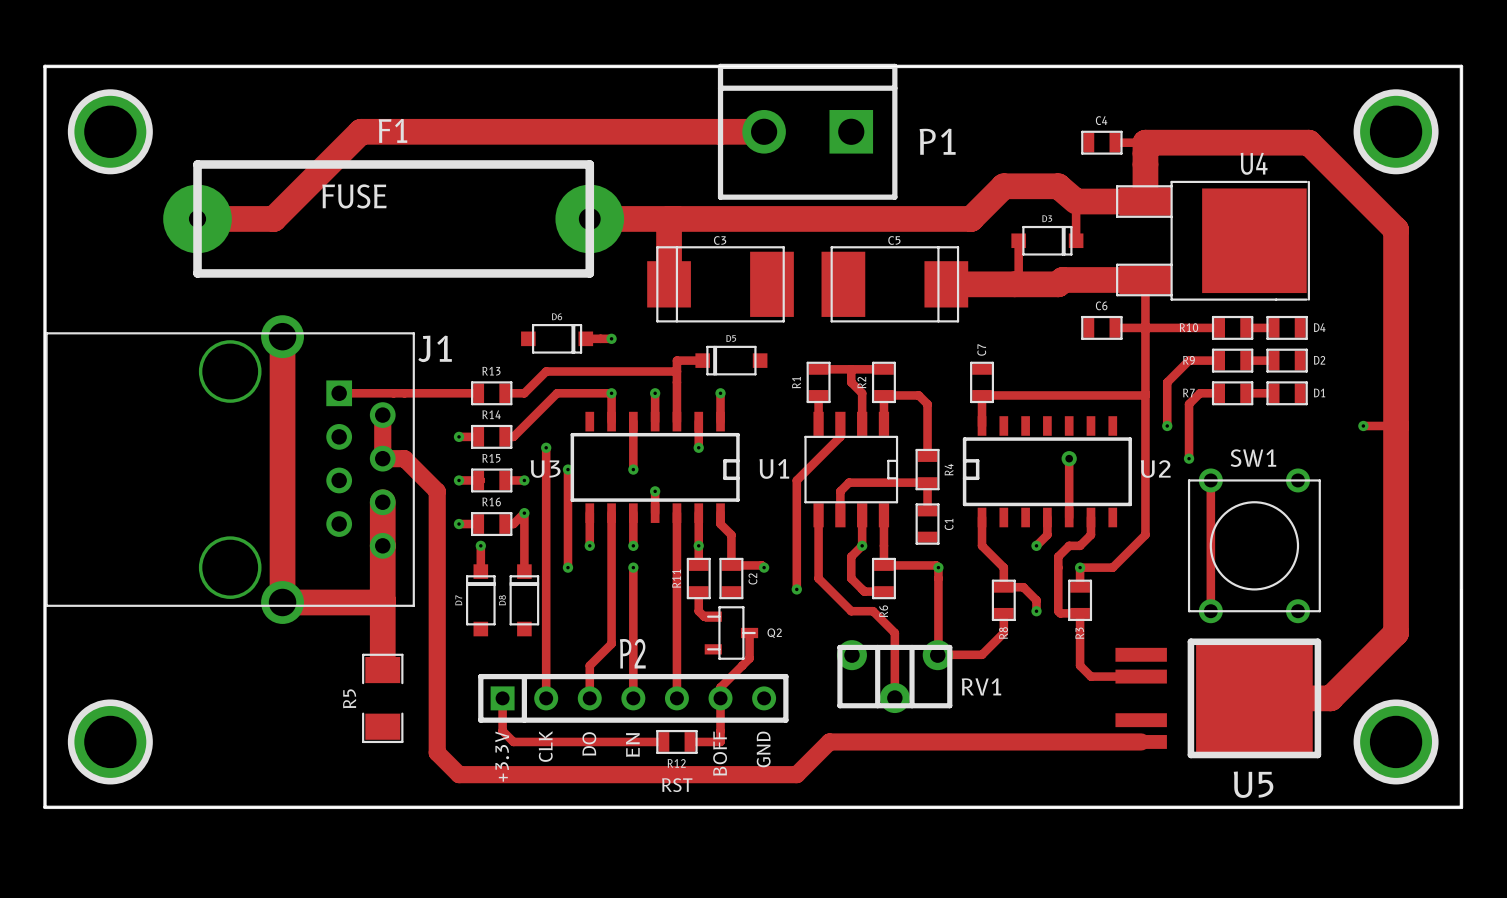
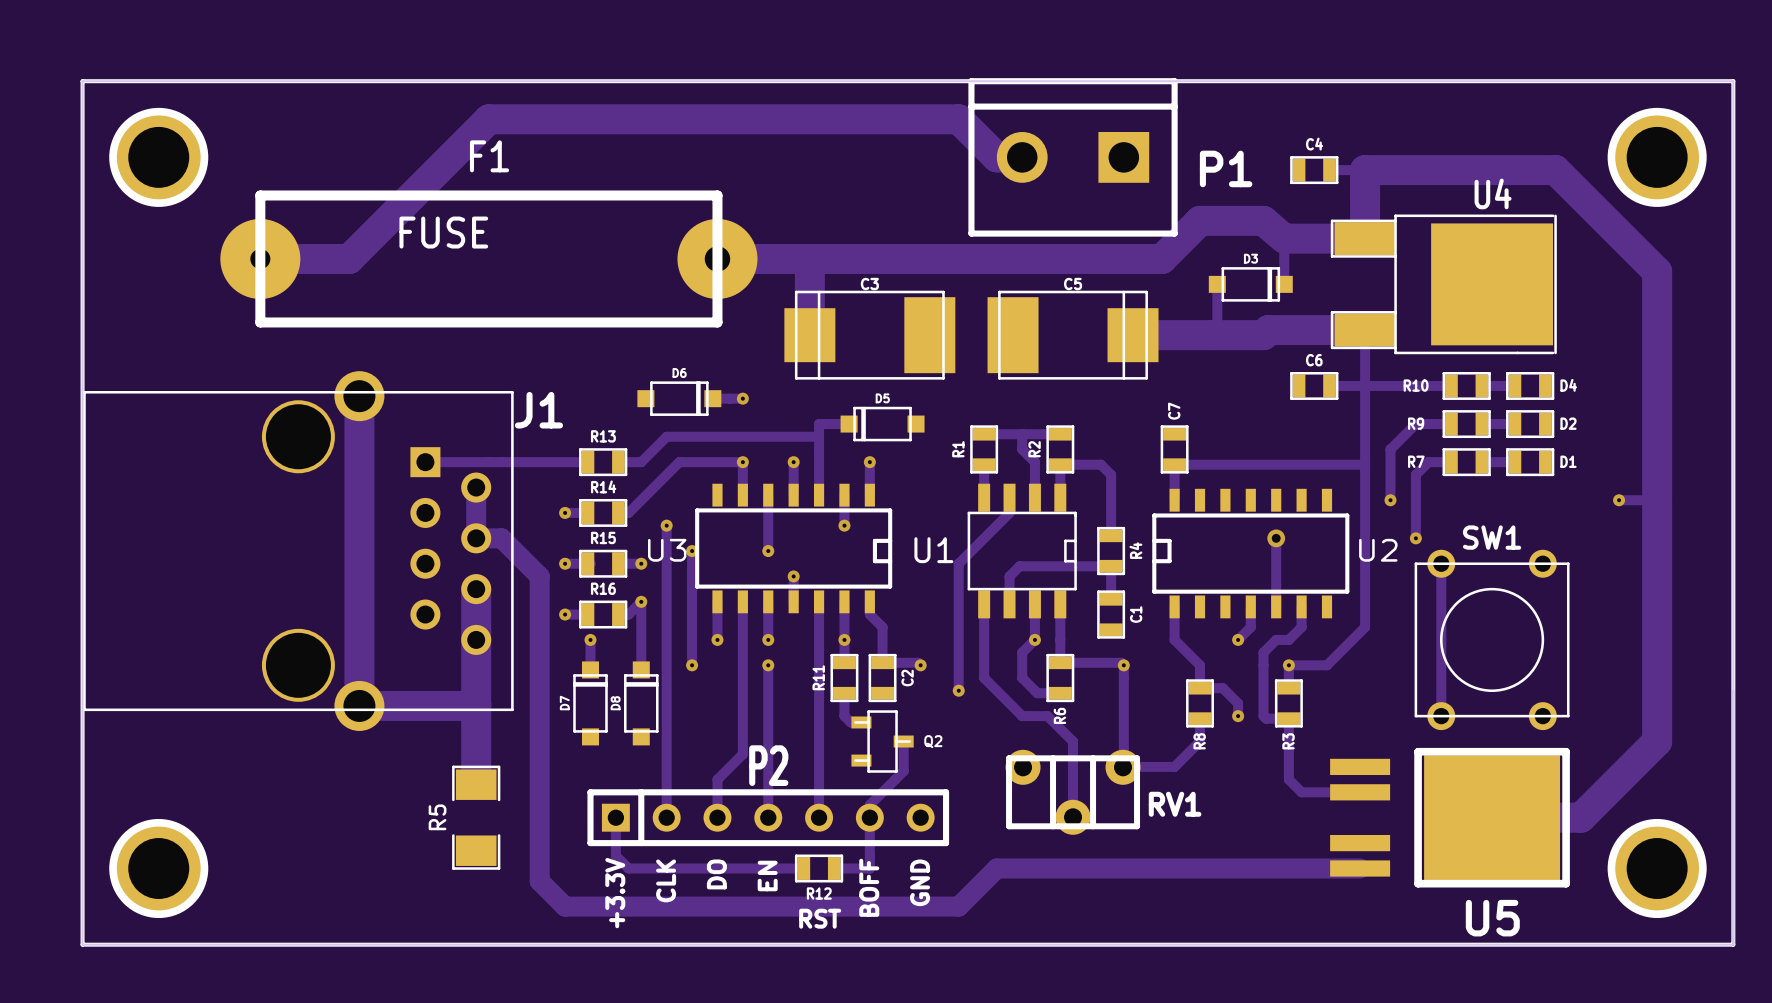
track: (360, 131) (764, 131) -> (450, 157) (488, 119) (958, 119) (996, 157) (1022, 157)
P1 position: (807, 131) -> (1073, 157)

